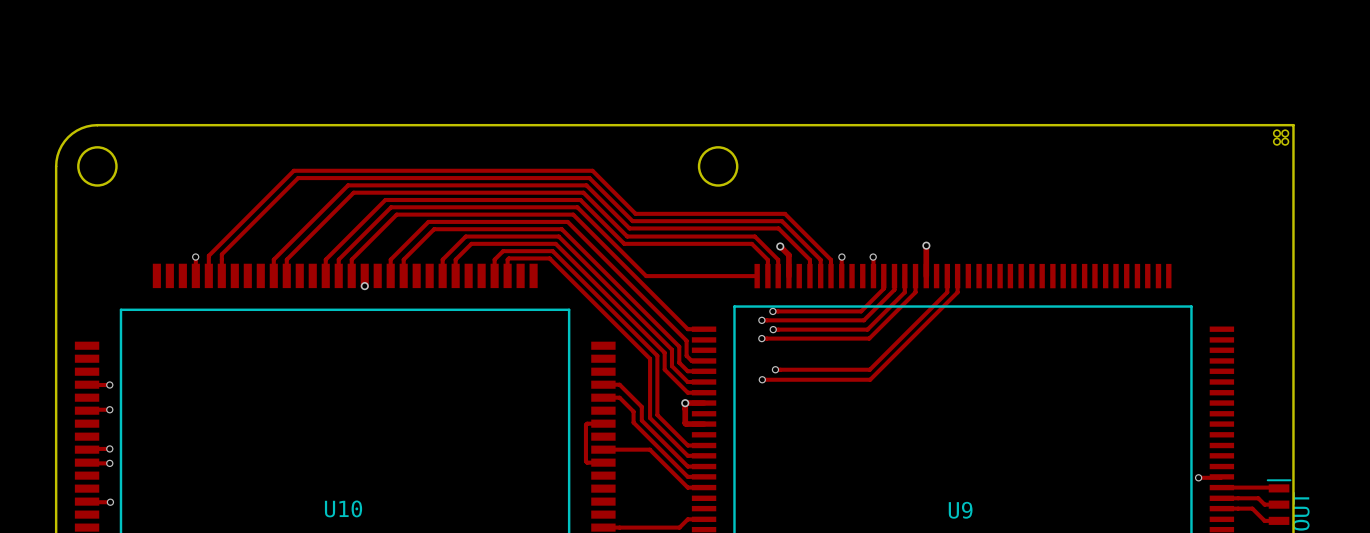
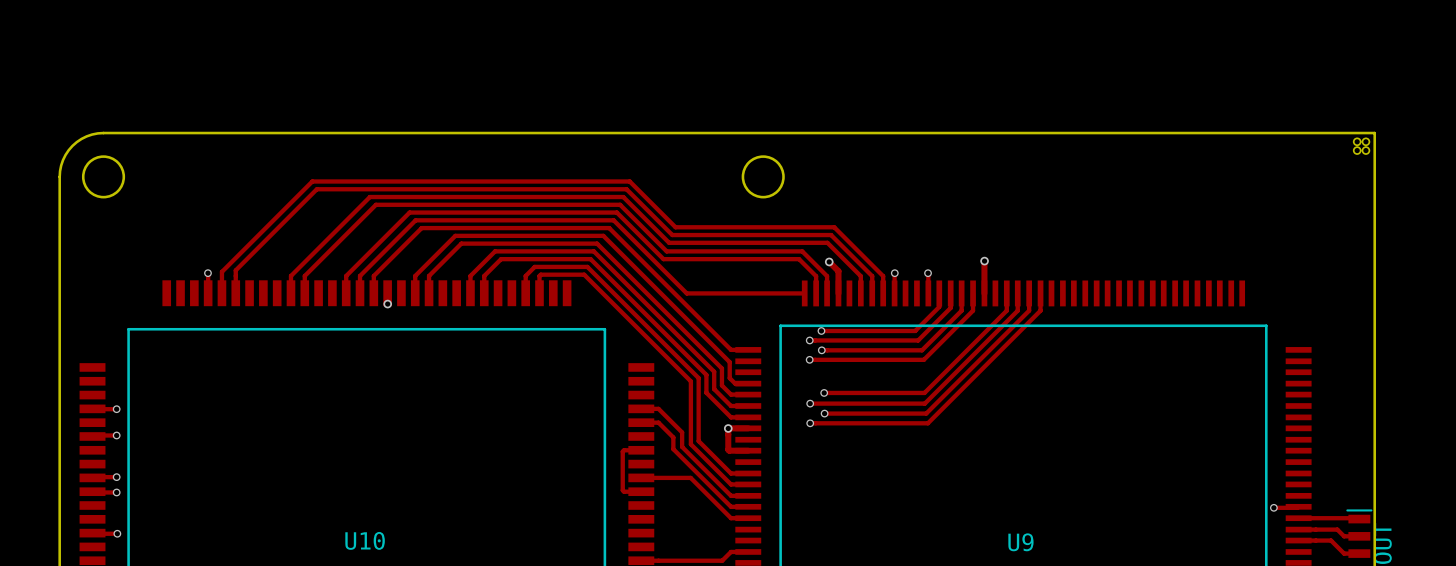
track: none -> (1029, 293) (1029, 310) (926, 413) (824, 413)
track: none -> (1040, 293) (1040, 310) (927, 423) (810, 423)
via: none -> (824, 413)
via: none -> (810, 423)

